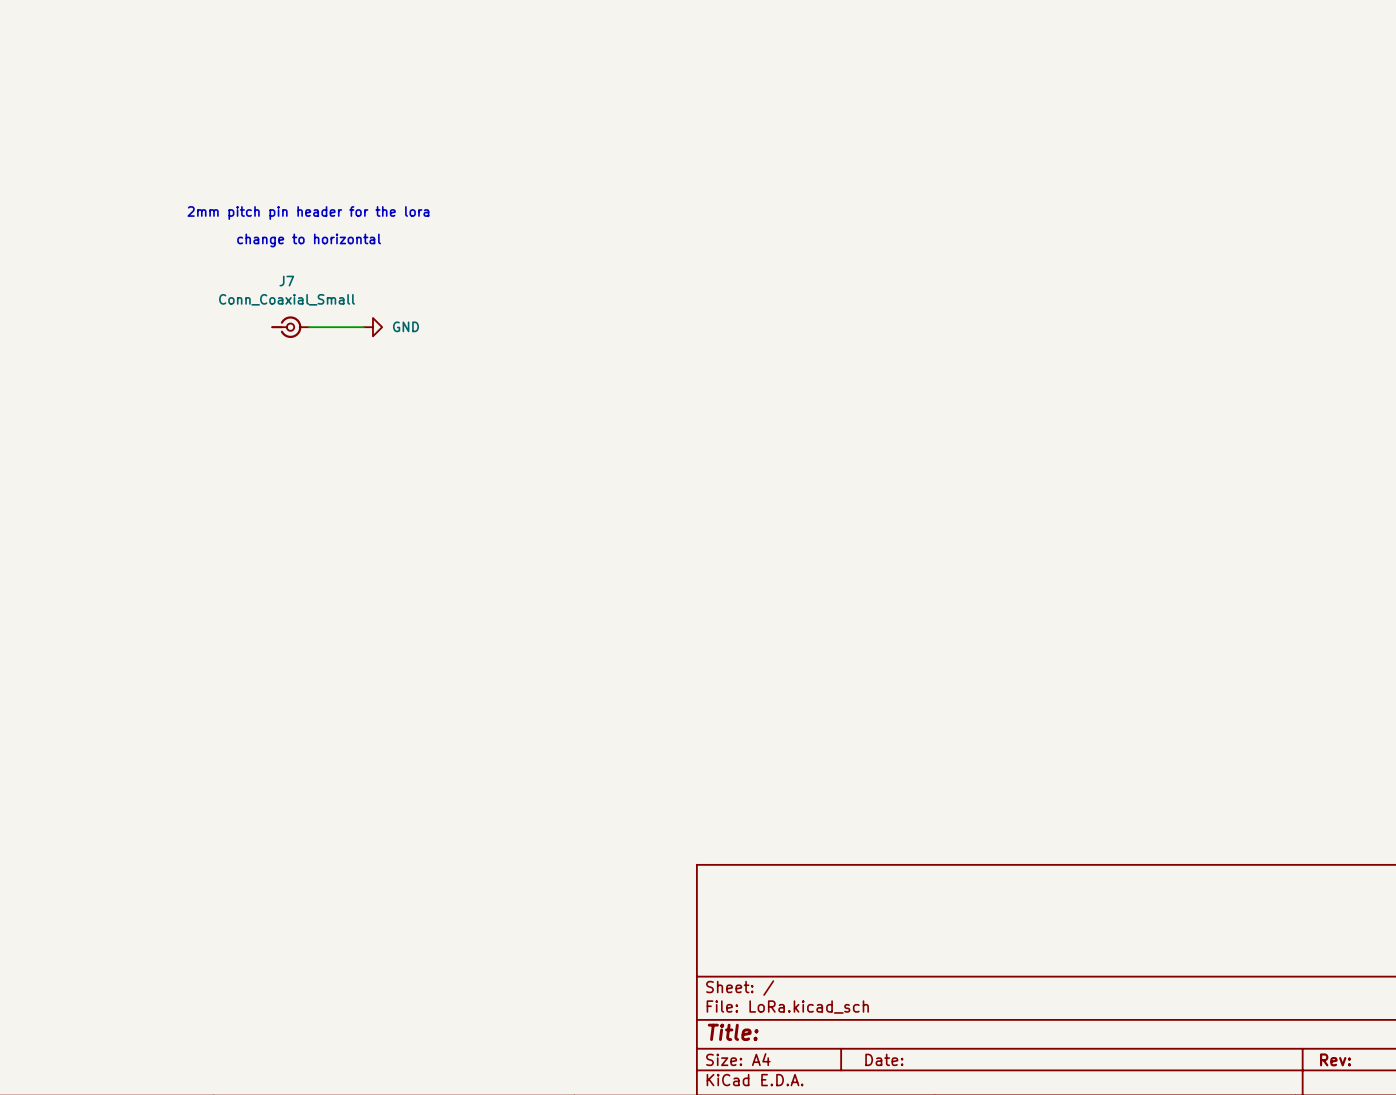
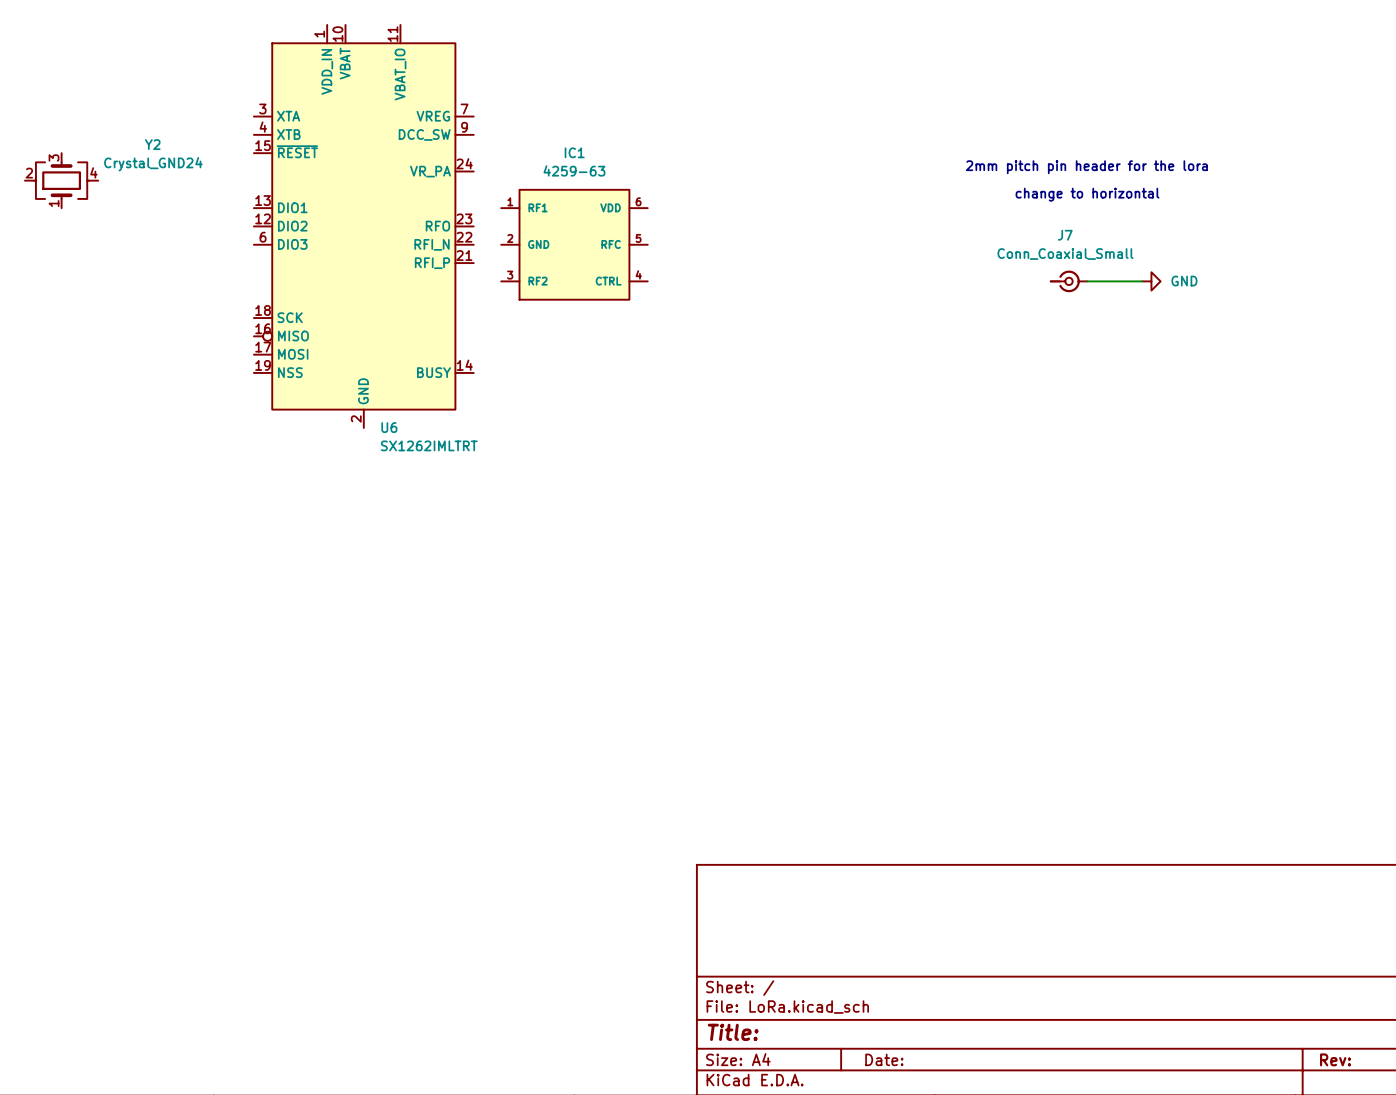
text: none -> 2mm pitch pin header for the lora (1086, 167)
Y2: none -> Crystal_GND24 (61, 180)
text: none -> change to horizontal (1087, 194)
text: 2mm pitch pin header for the lora (308, 213) -> none
U6: none -> SX1262IMLTRT (363, 226)
text: change to horizontal (309, 240) -> none
IC1: none -> 4259-63 (574, 244)
wire: none -> (1087, 281) (1142, 281)
power symbol: none -> GND (1151, 281)
J7 position: (290, 327) -> (1069, 281)
power symbol: GND (372, 327) -> none

